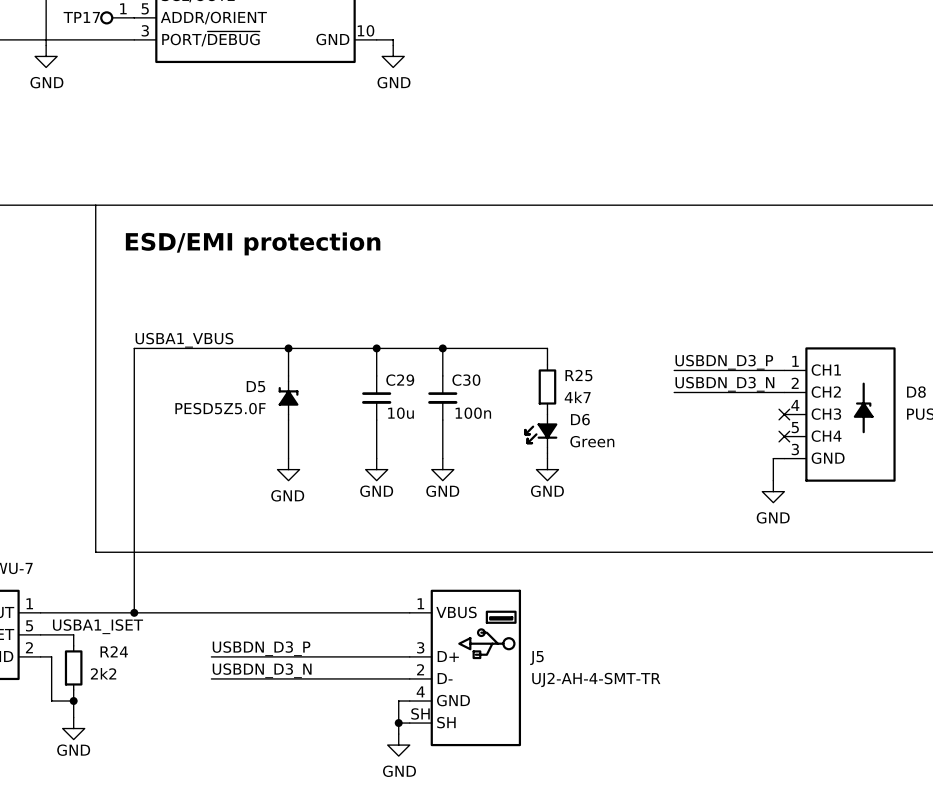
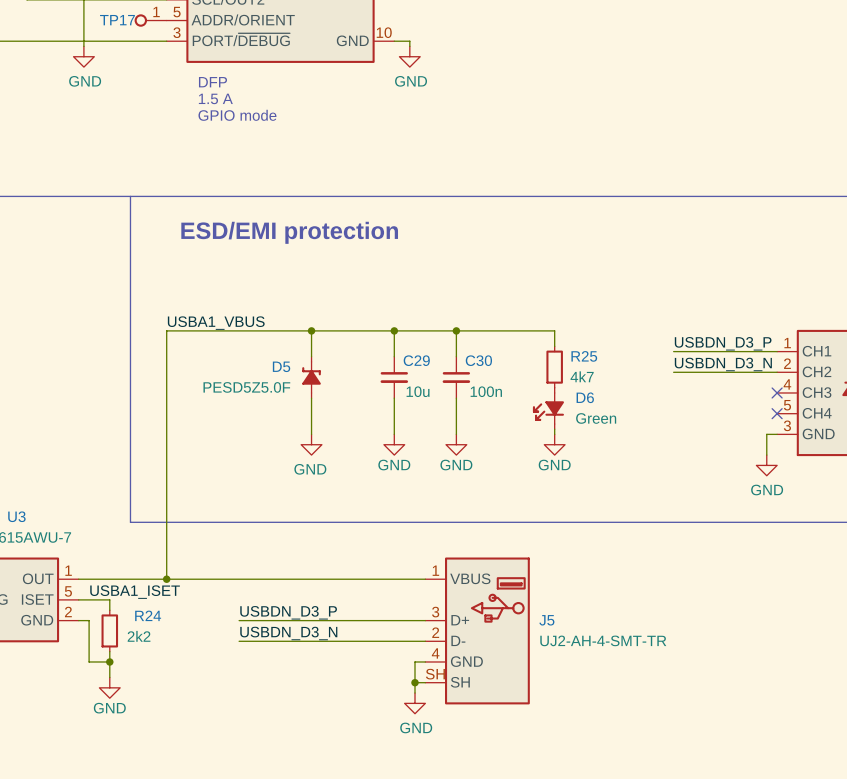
text: none -> DFP (212, 82)
text: none -> 1.5 A (215, 98)
text: none -> GPIO mode (237, 115)

